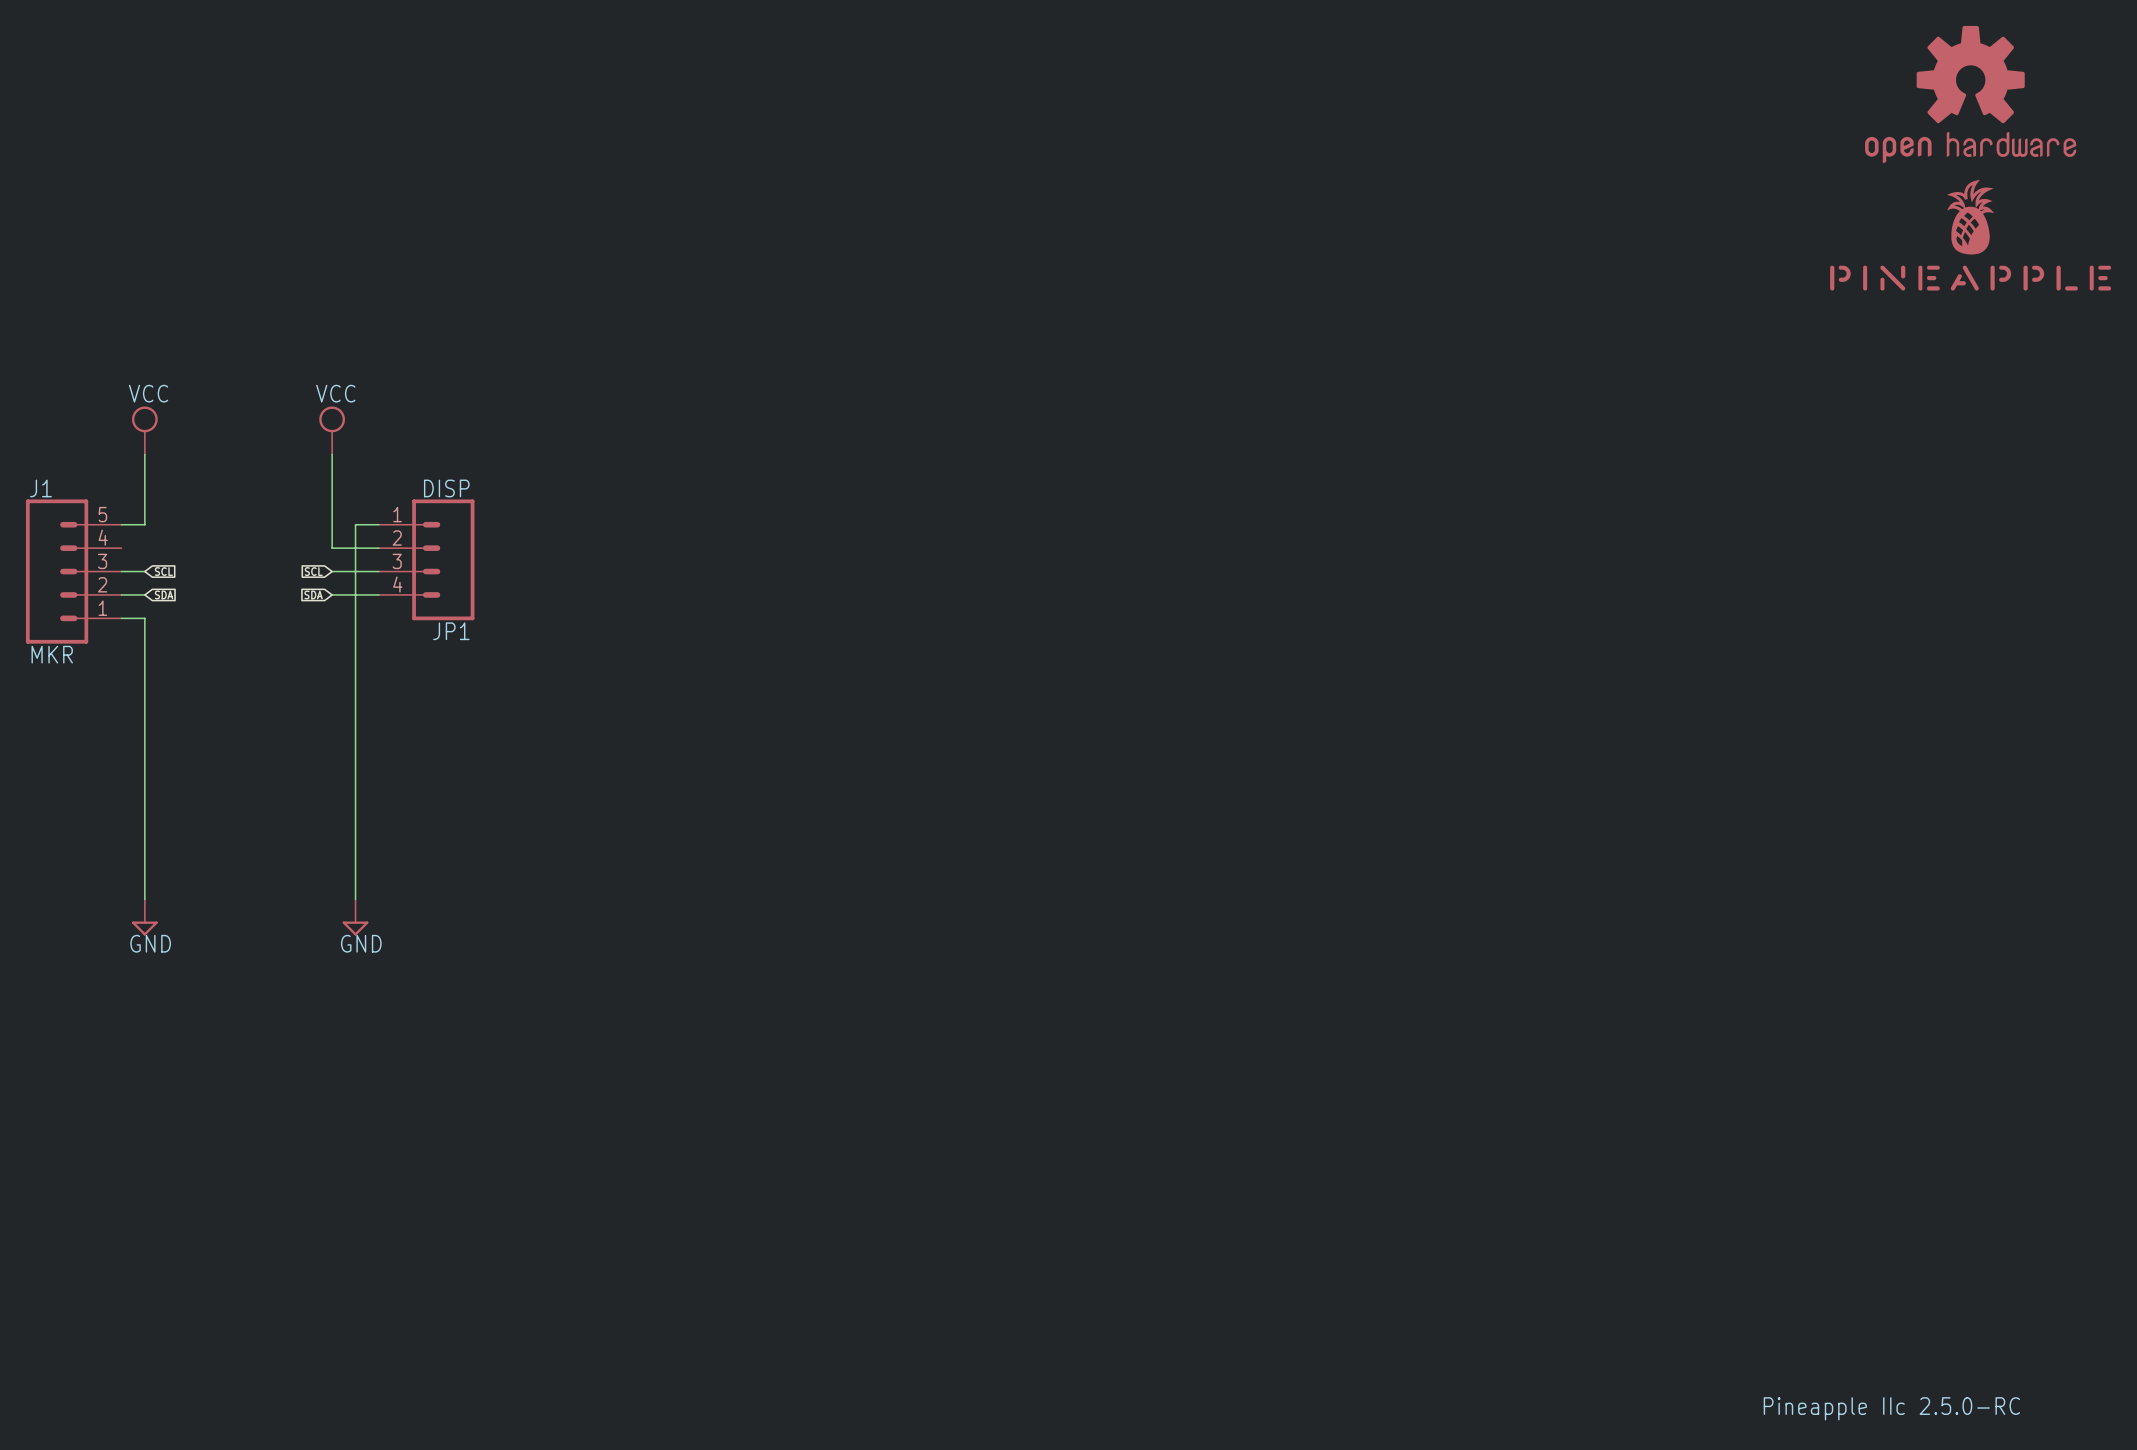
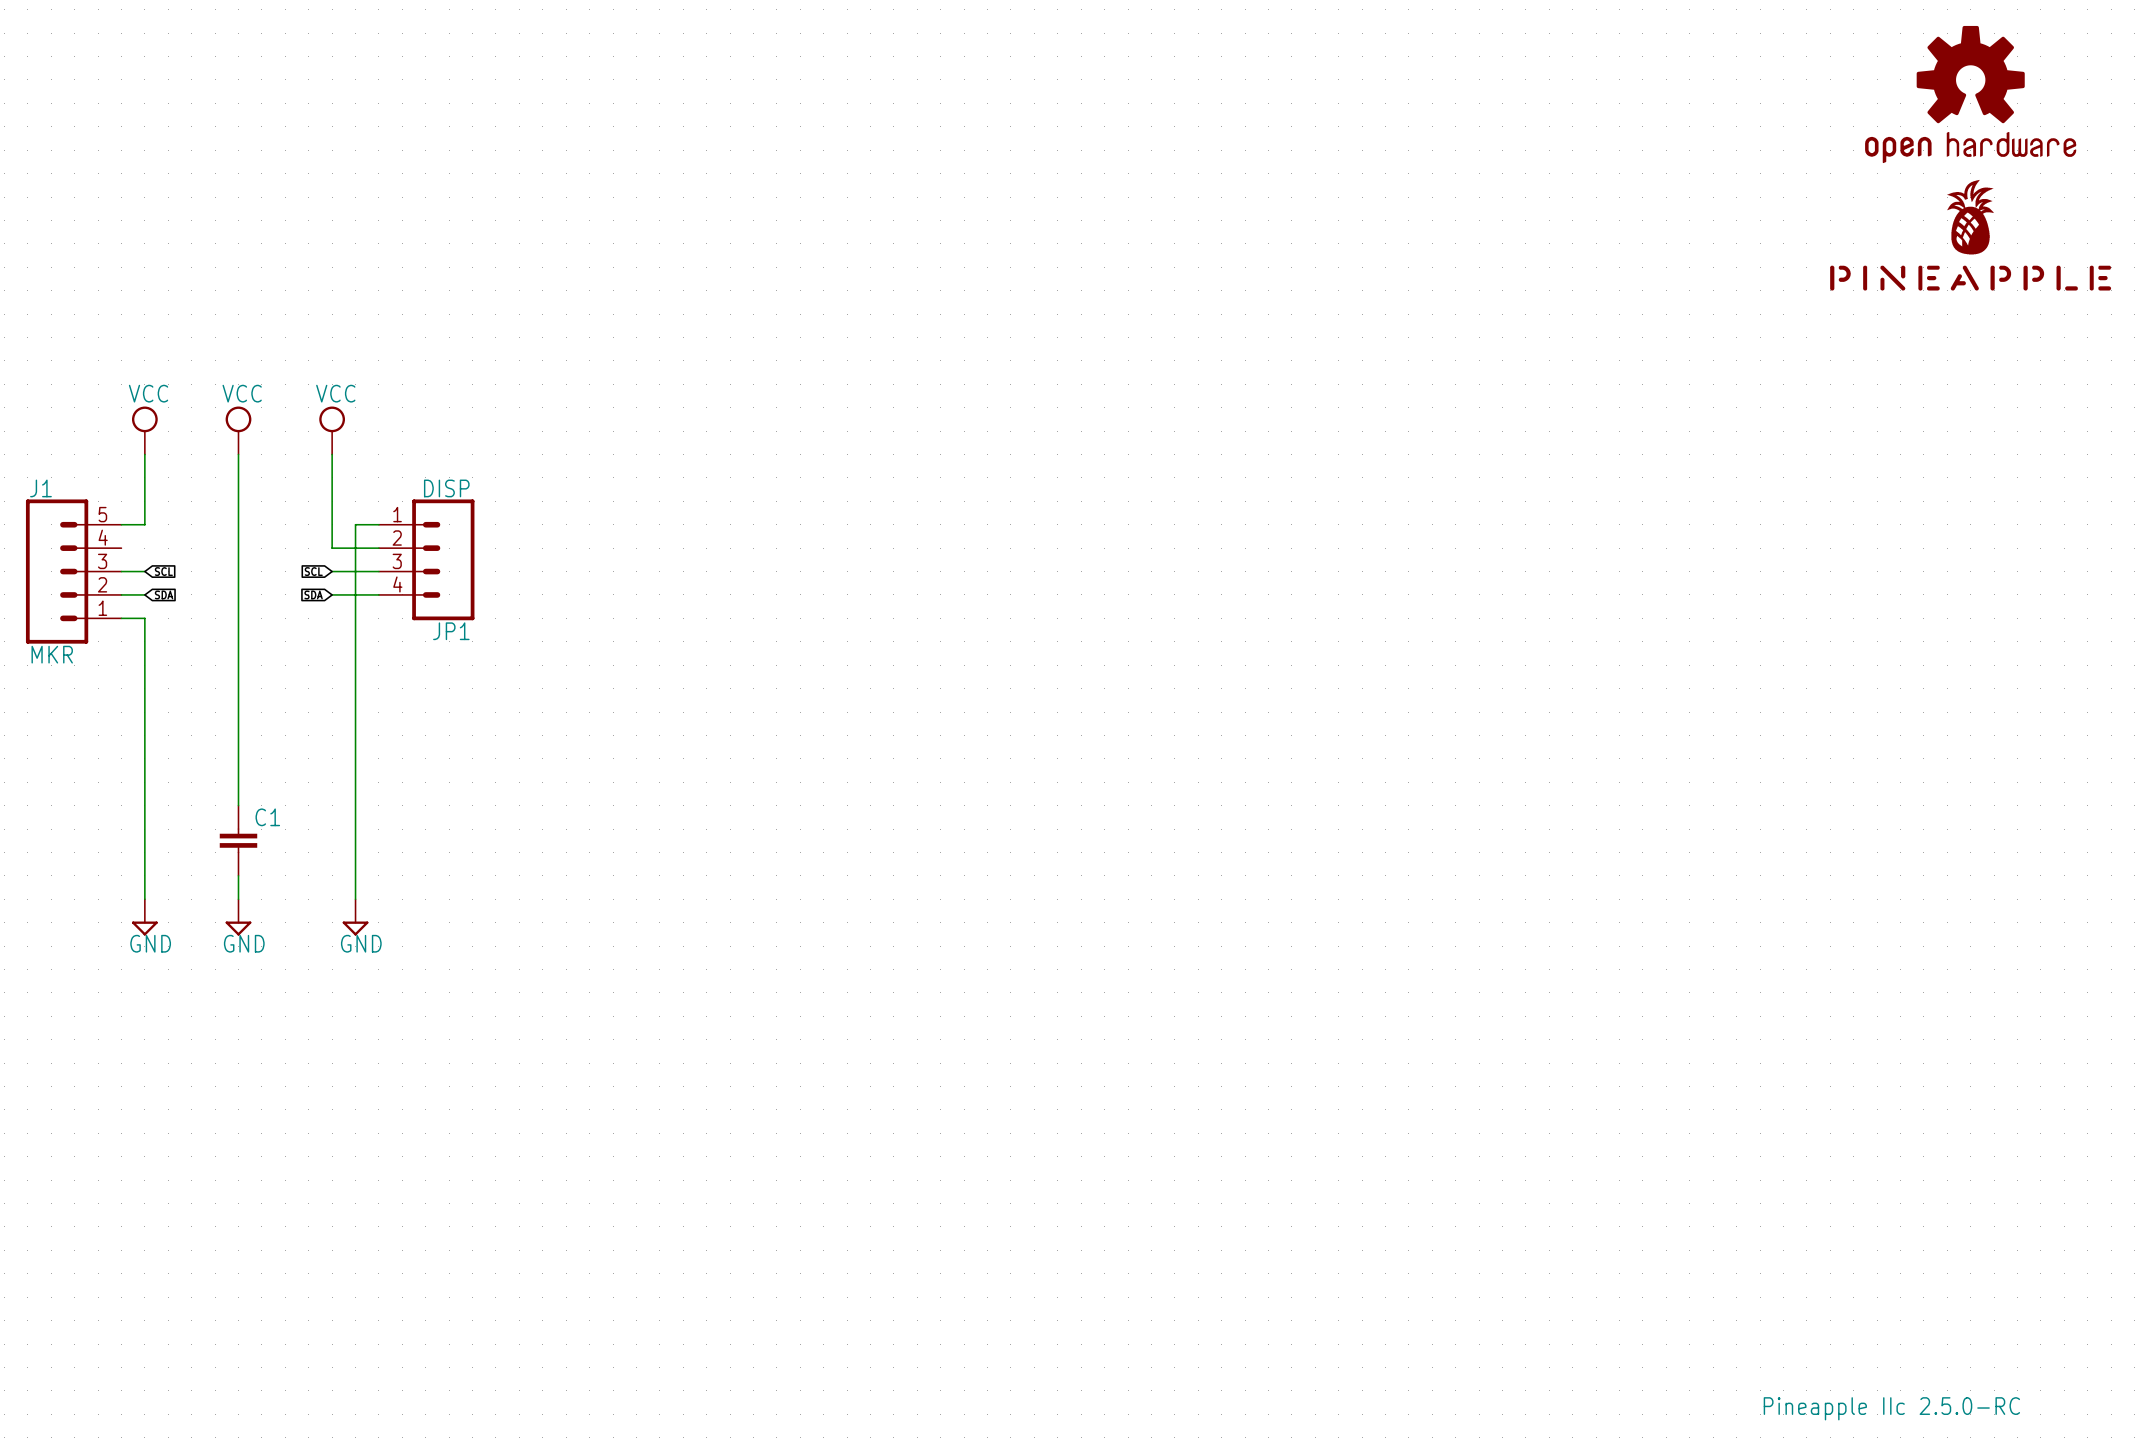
power symbol: none -> VCC (238, 430)
wire: none -> (238, 454) (238, 805)
C1: none -> (238, 840)
wire: none -> (238, 875) (238, 899)
power symbol: none -> GND (238, 917)

